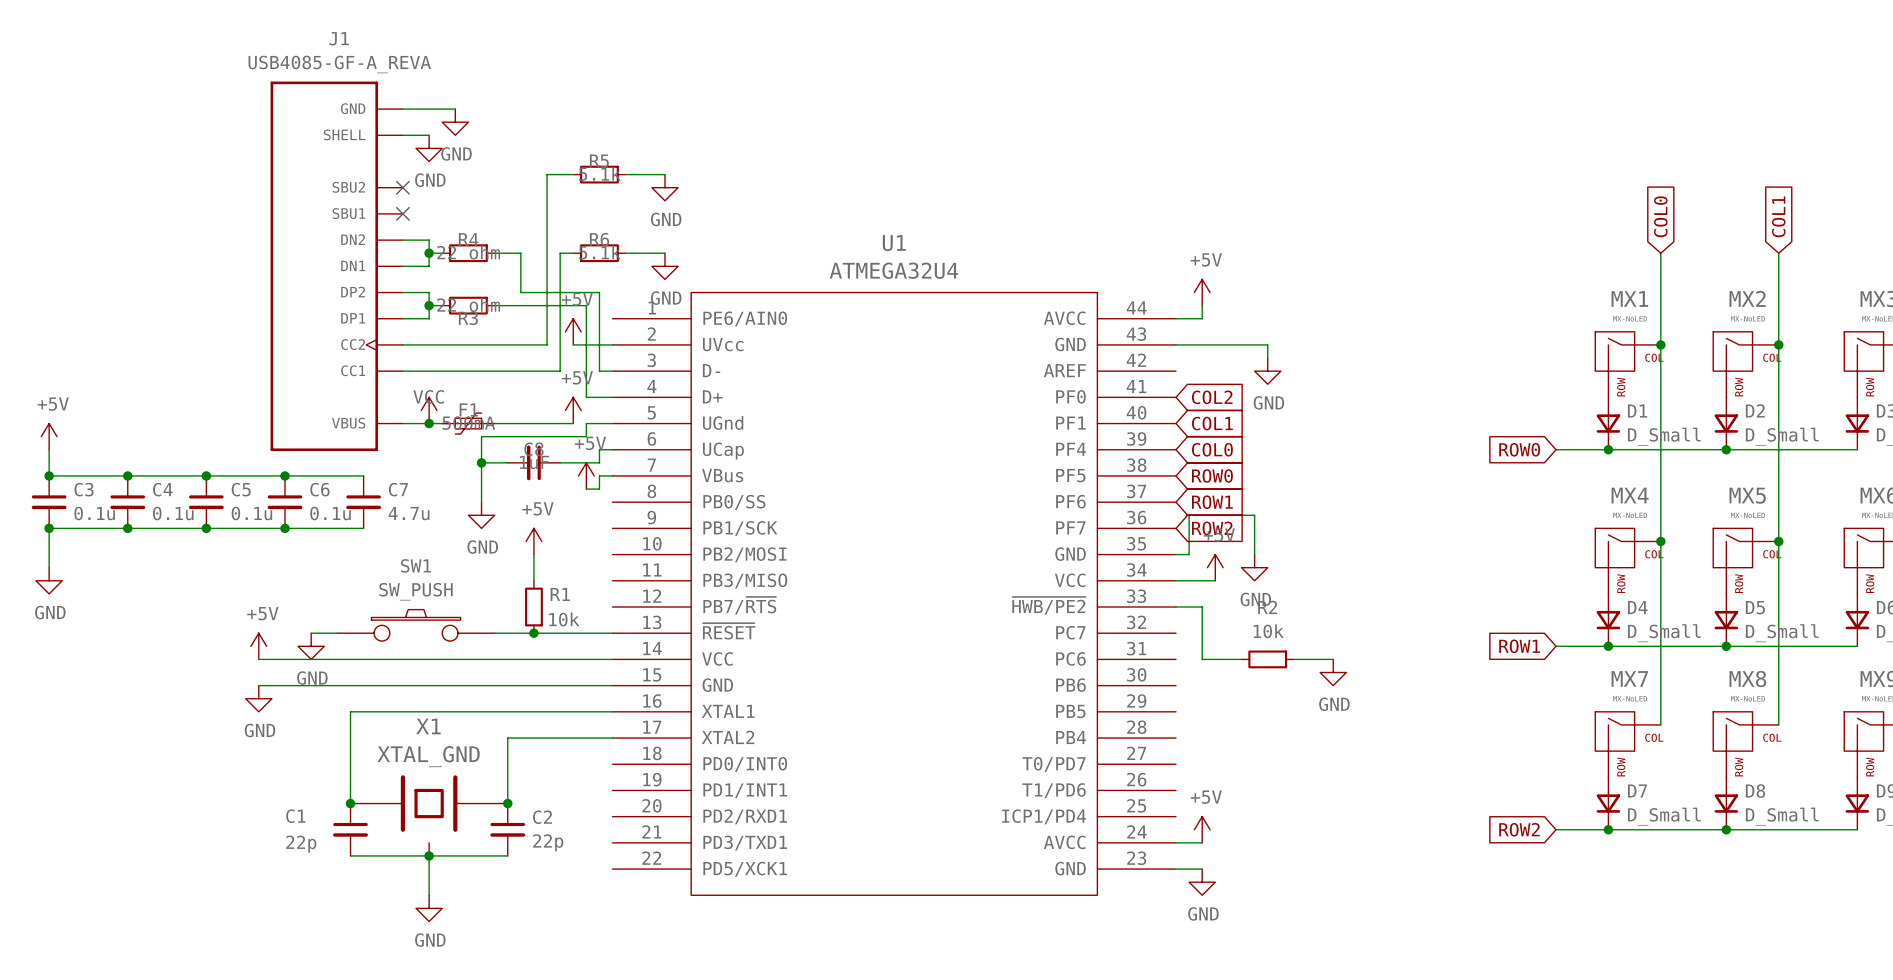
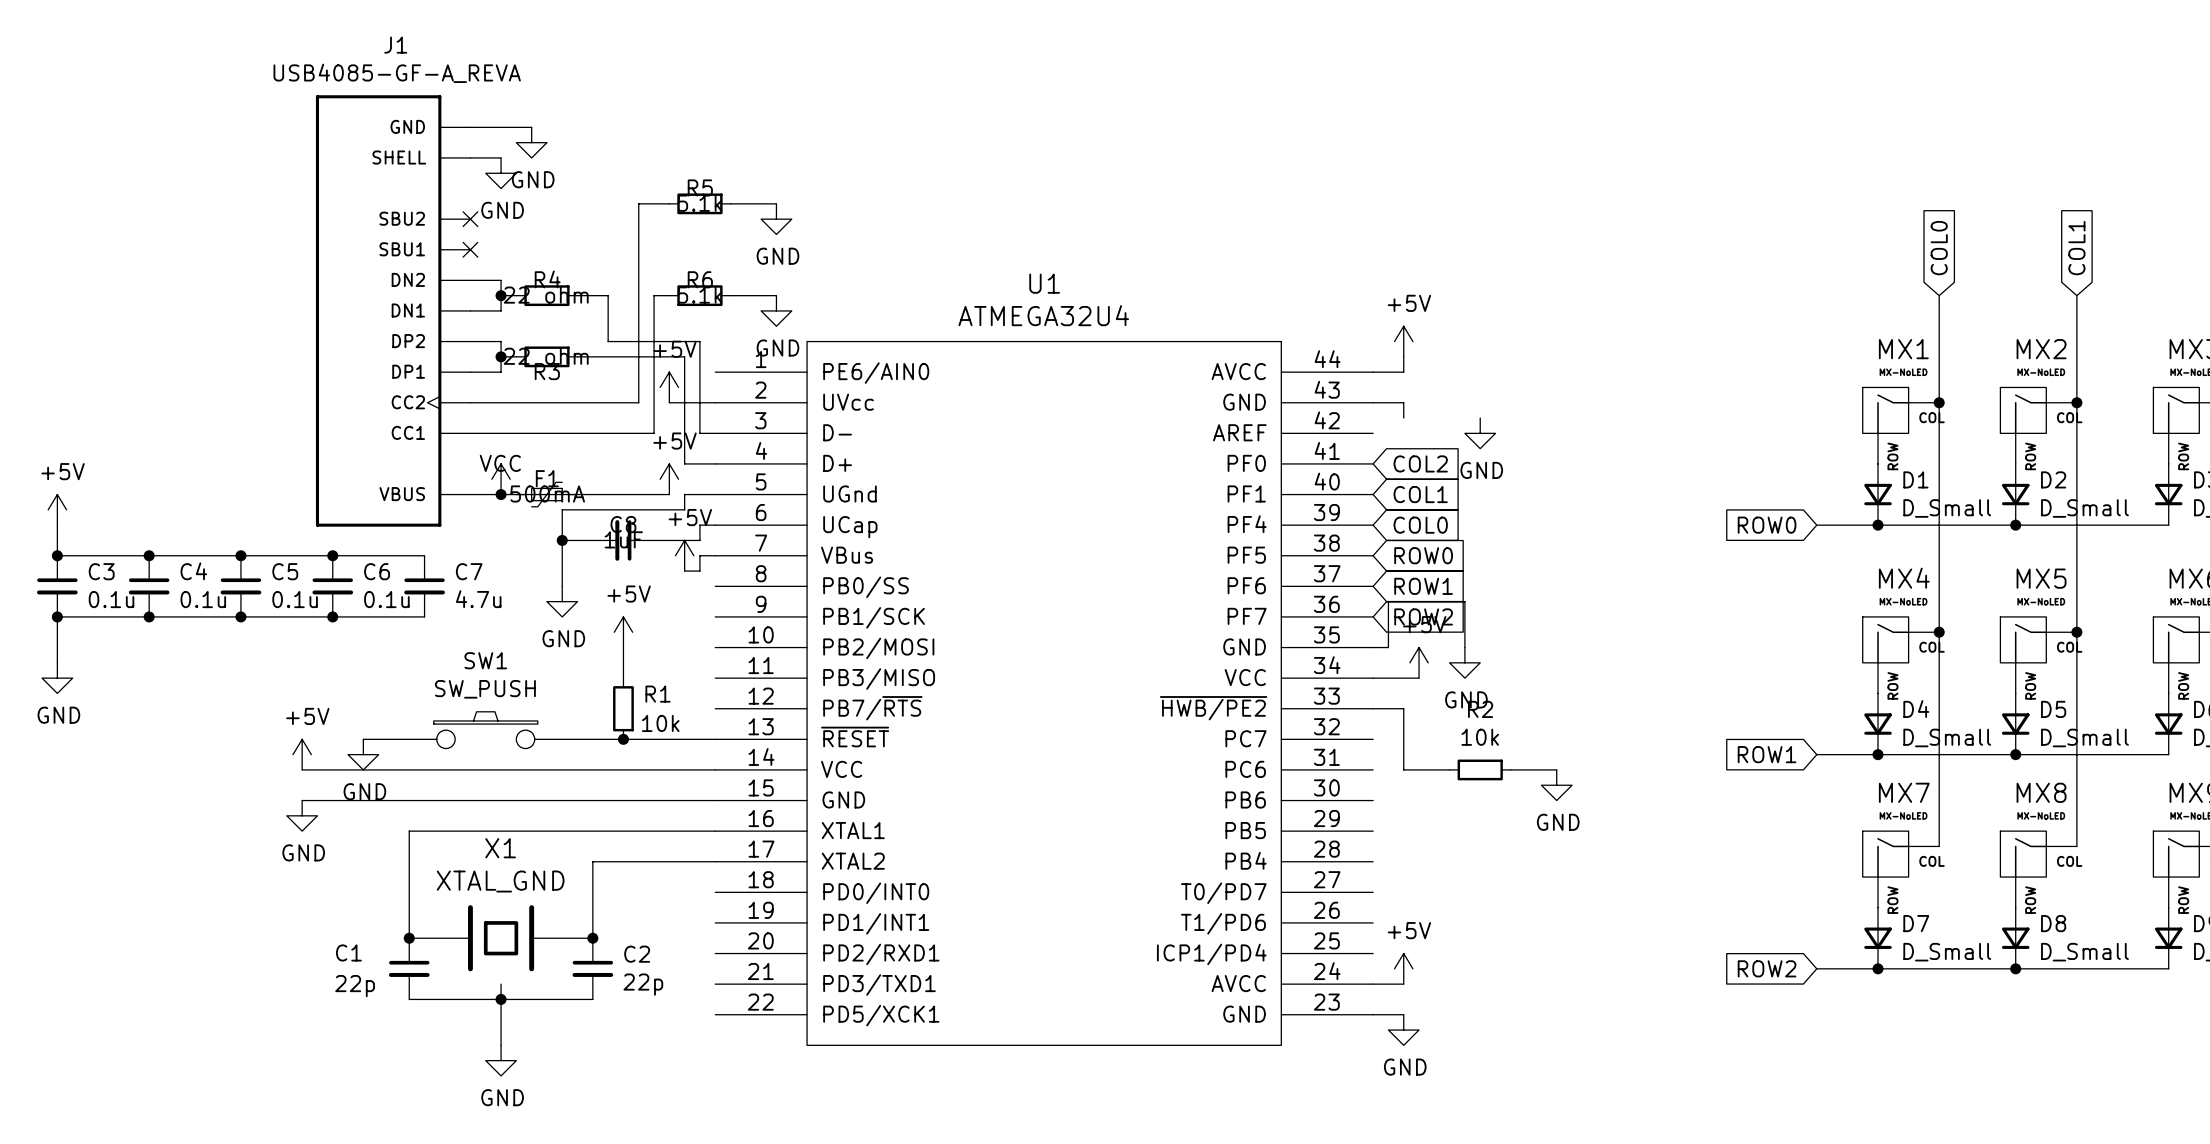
wire: (1202, 344) (1267, 344) (1267, 358) -> (1403, 402) (1403, 418)

